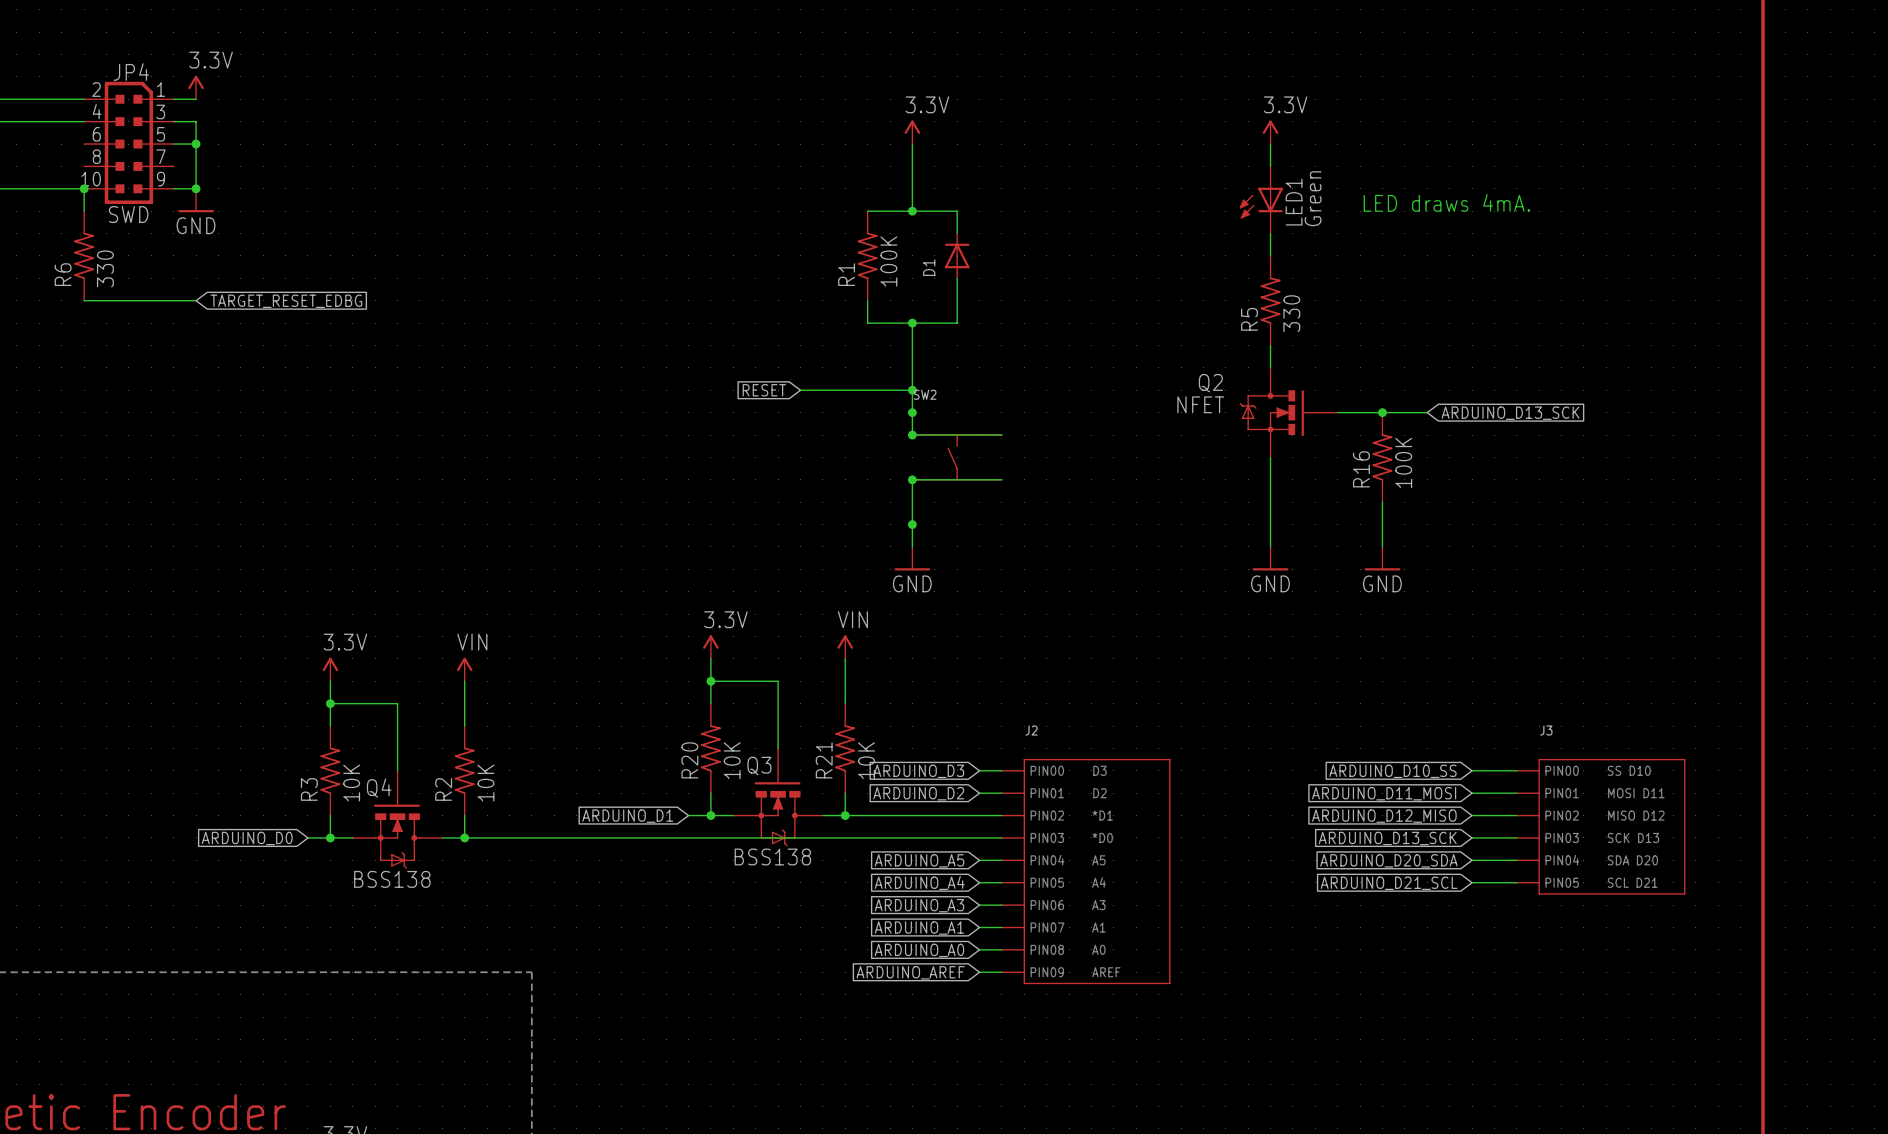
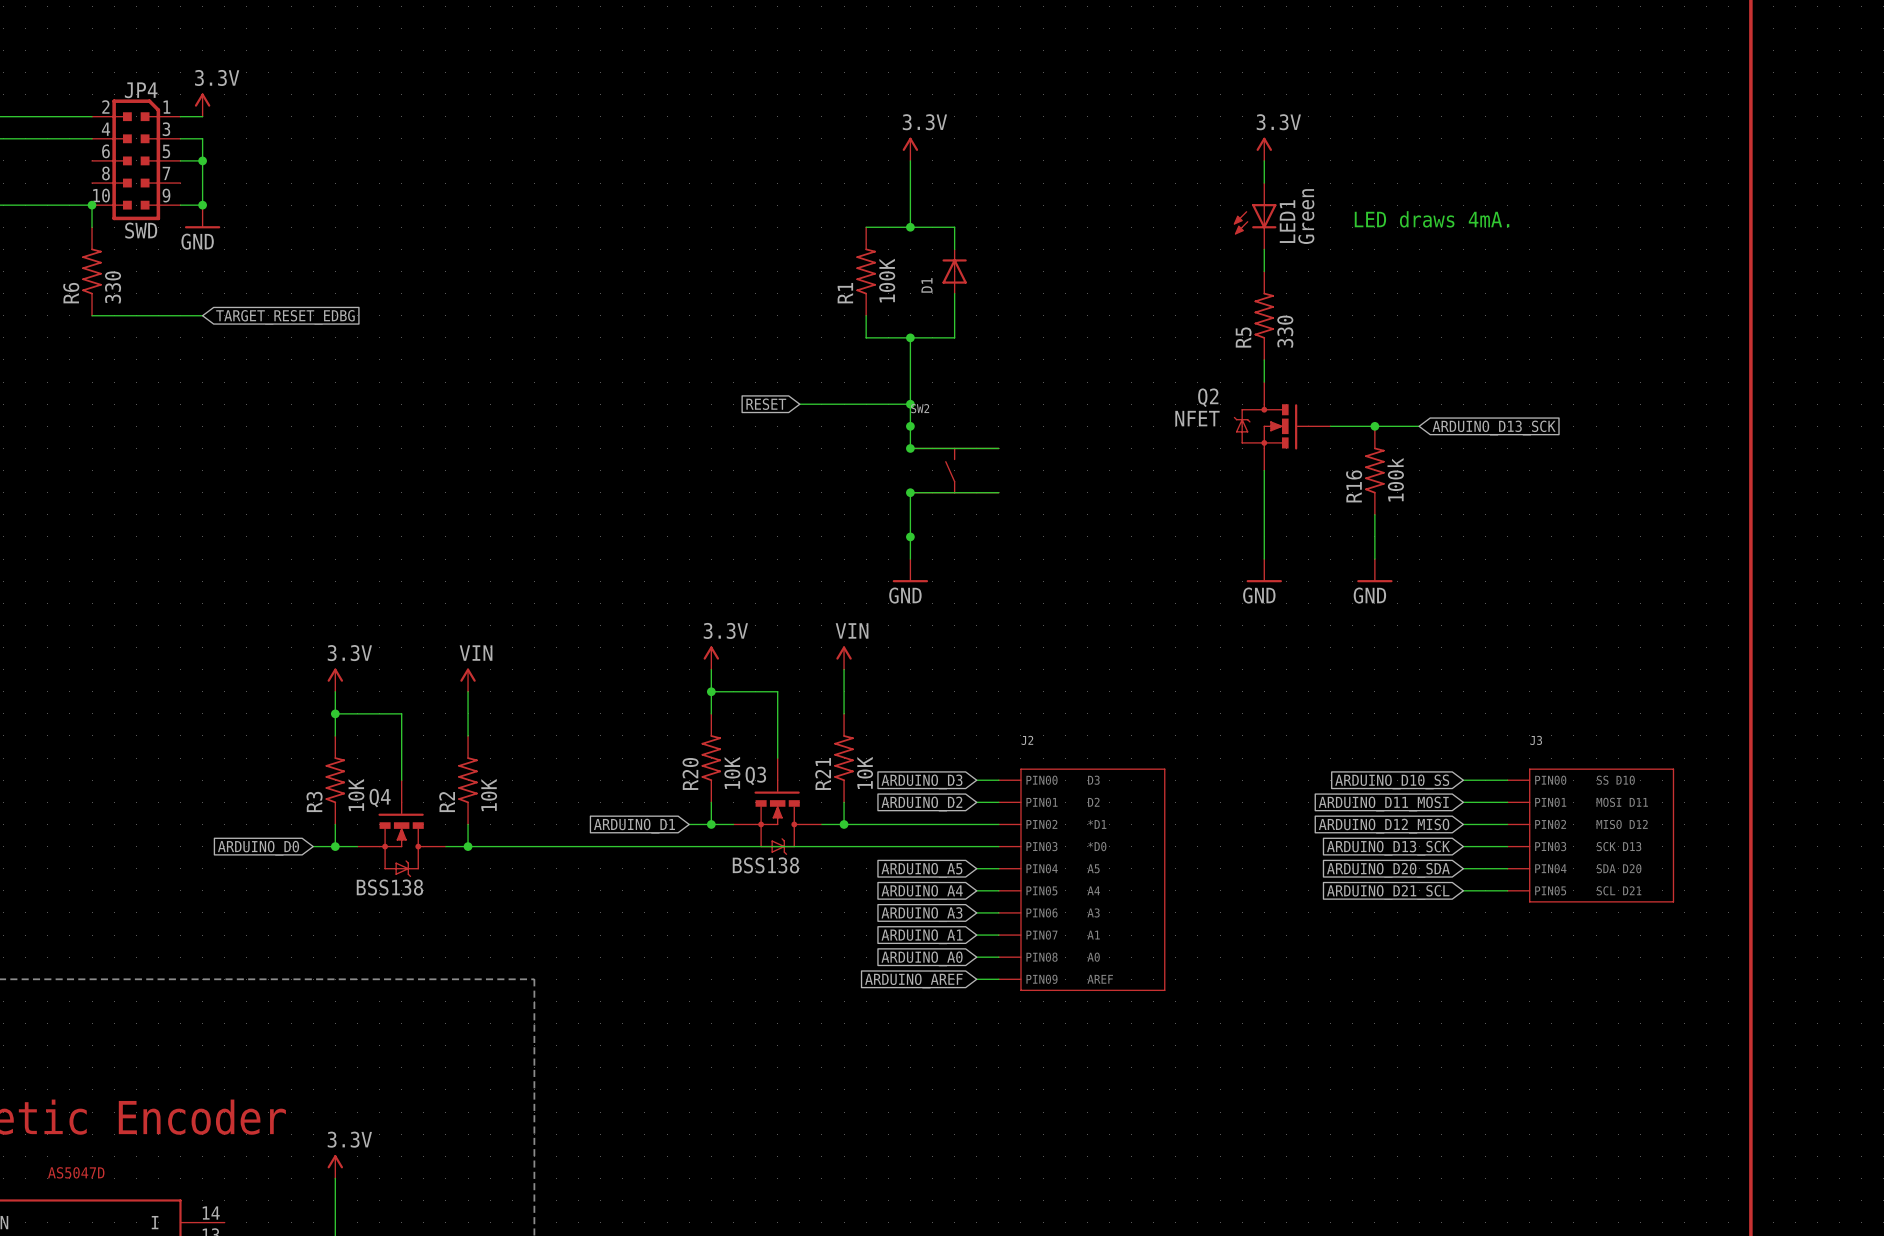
R16 value: 100K (1403, 462) -> 100k (1395, 479)

